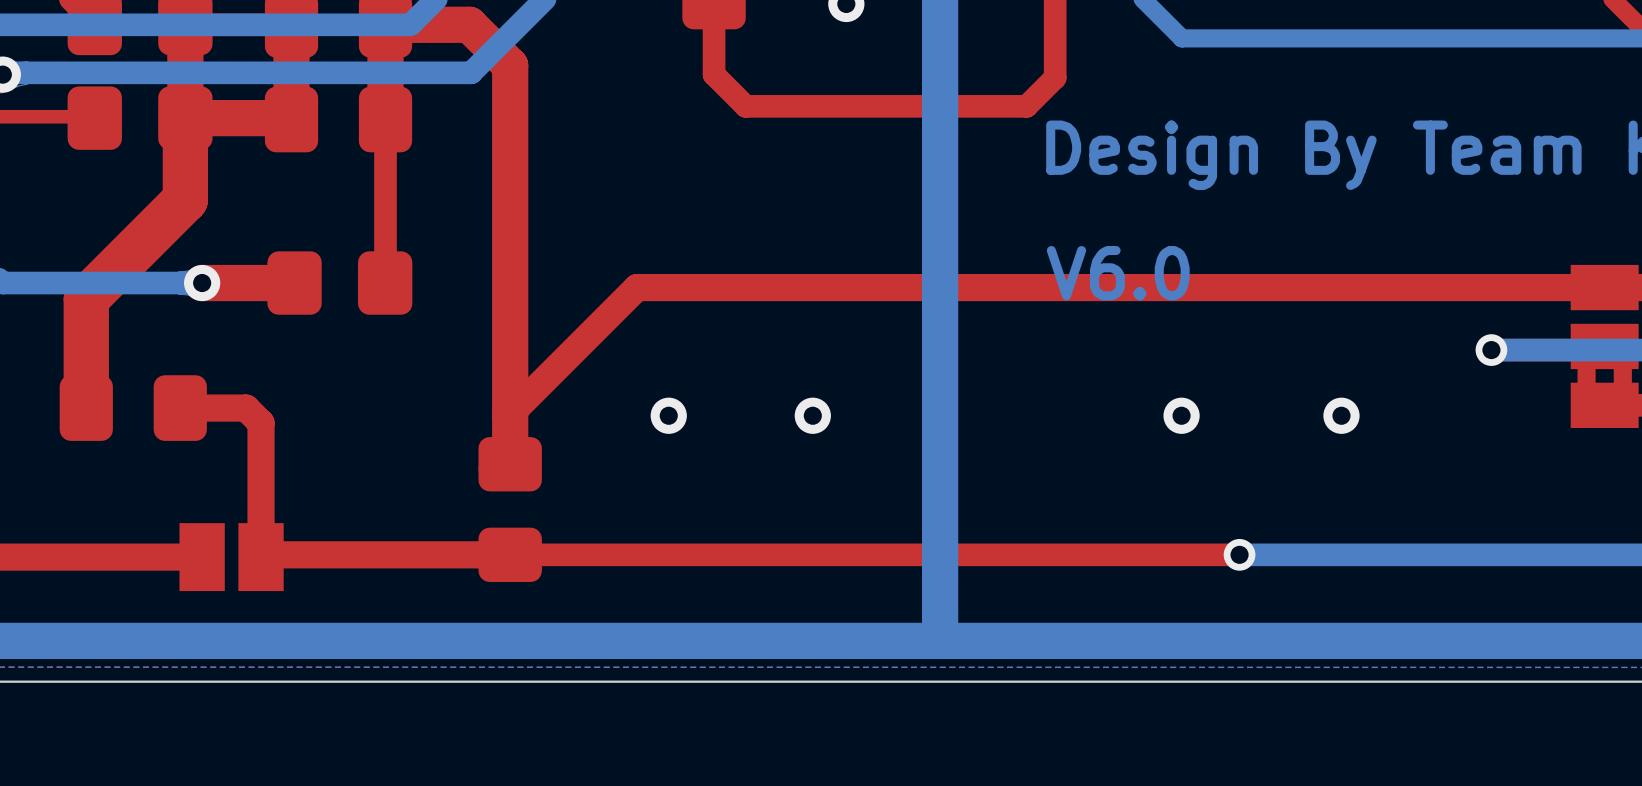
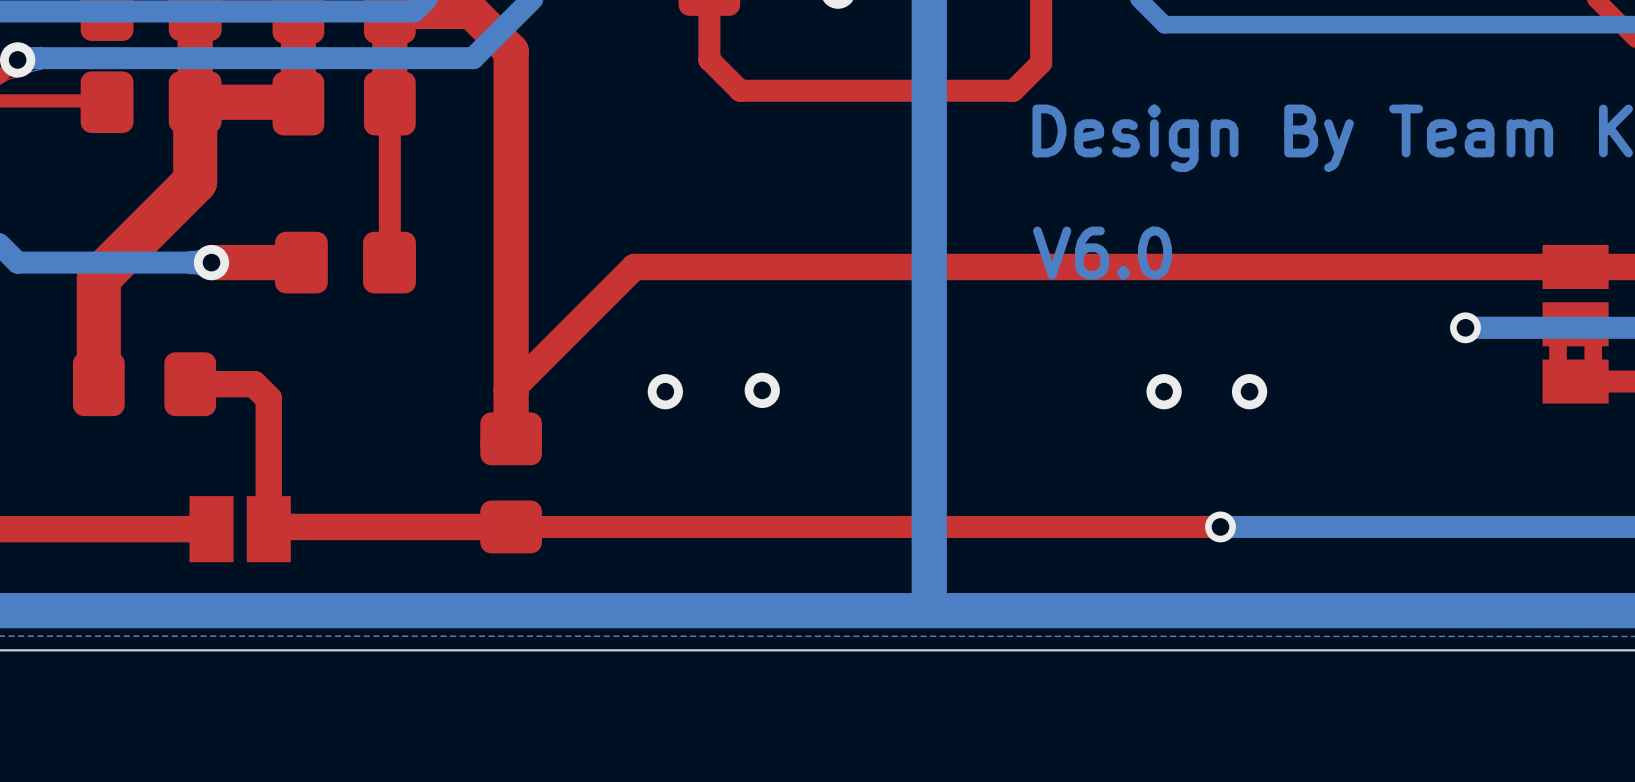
via position: (812, 415) -> (762, 390)
via position: (1341, 415) -> (1249, 391)

